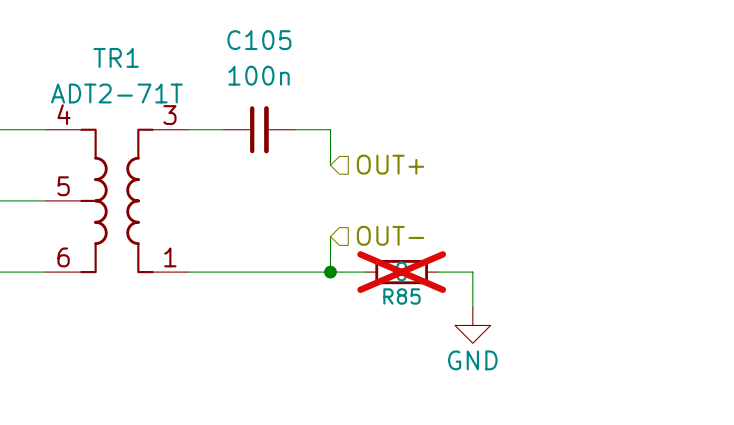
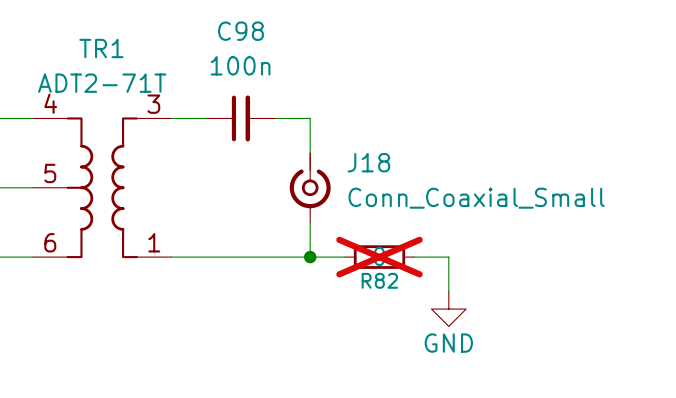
C105 name: C105 (259, 40) -> C98 (240, 31)
hierarchical label: OUT+ (390, 164) -> none
J18: none -> Conn_Coaxial_Small (310, 187)
hierarchical label: OUT- (390, 235) -> none
R85 name: R85 (402, 296) -> R82 (379, 280)

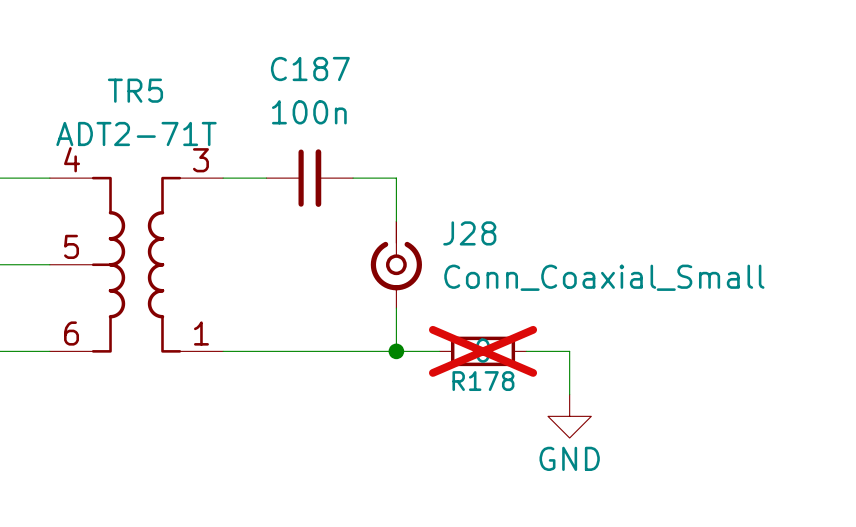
C98 name: C98 (240, 31) -> C187 (310, 69)
TR1 name: TR1 (101, 48) -> TR5 (135, 90)
J18 name: J18 (368, 162) -> J28 (469, 233)
R82 name: R82 (379, 280) -> R178 (483, 381)

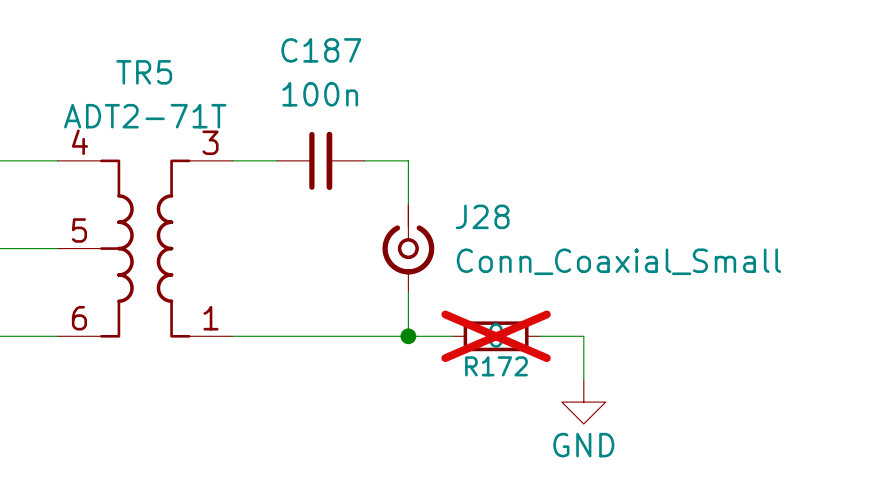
R178 name: R178 (483, 381) -> R172 (496, 366)

